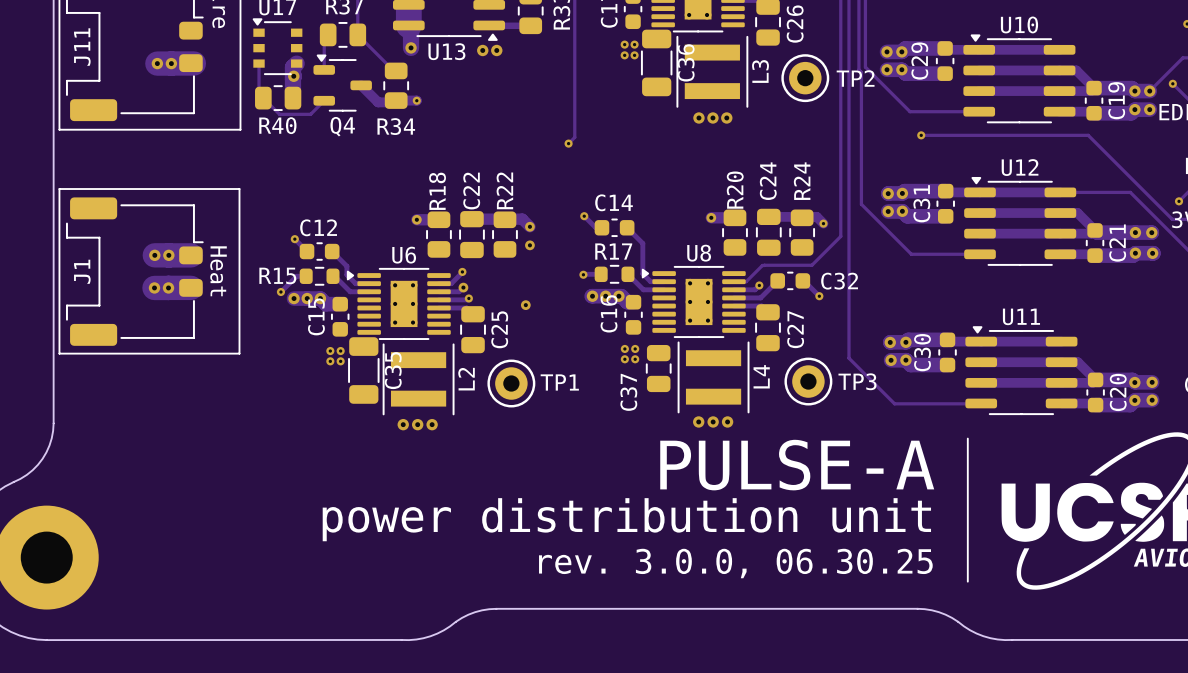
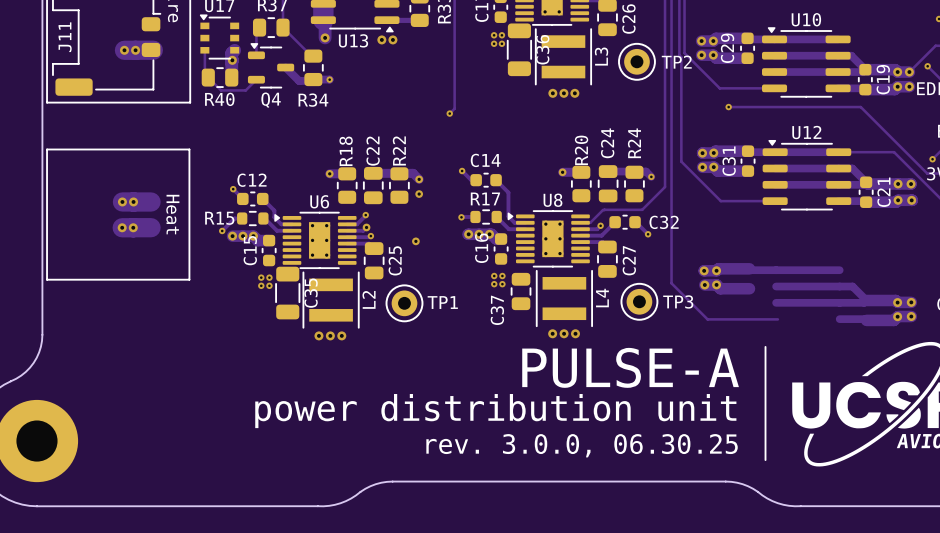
J1: (134, 271) -> none
C30: (947, 352) -> none
U11: (1021, 370) -> none
C20: (1095, 392) -> none

